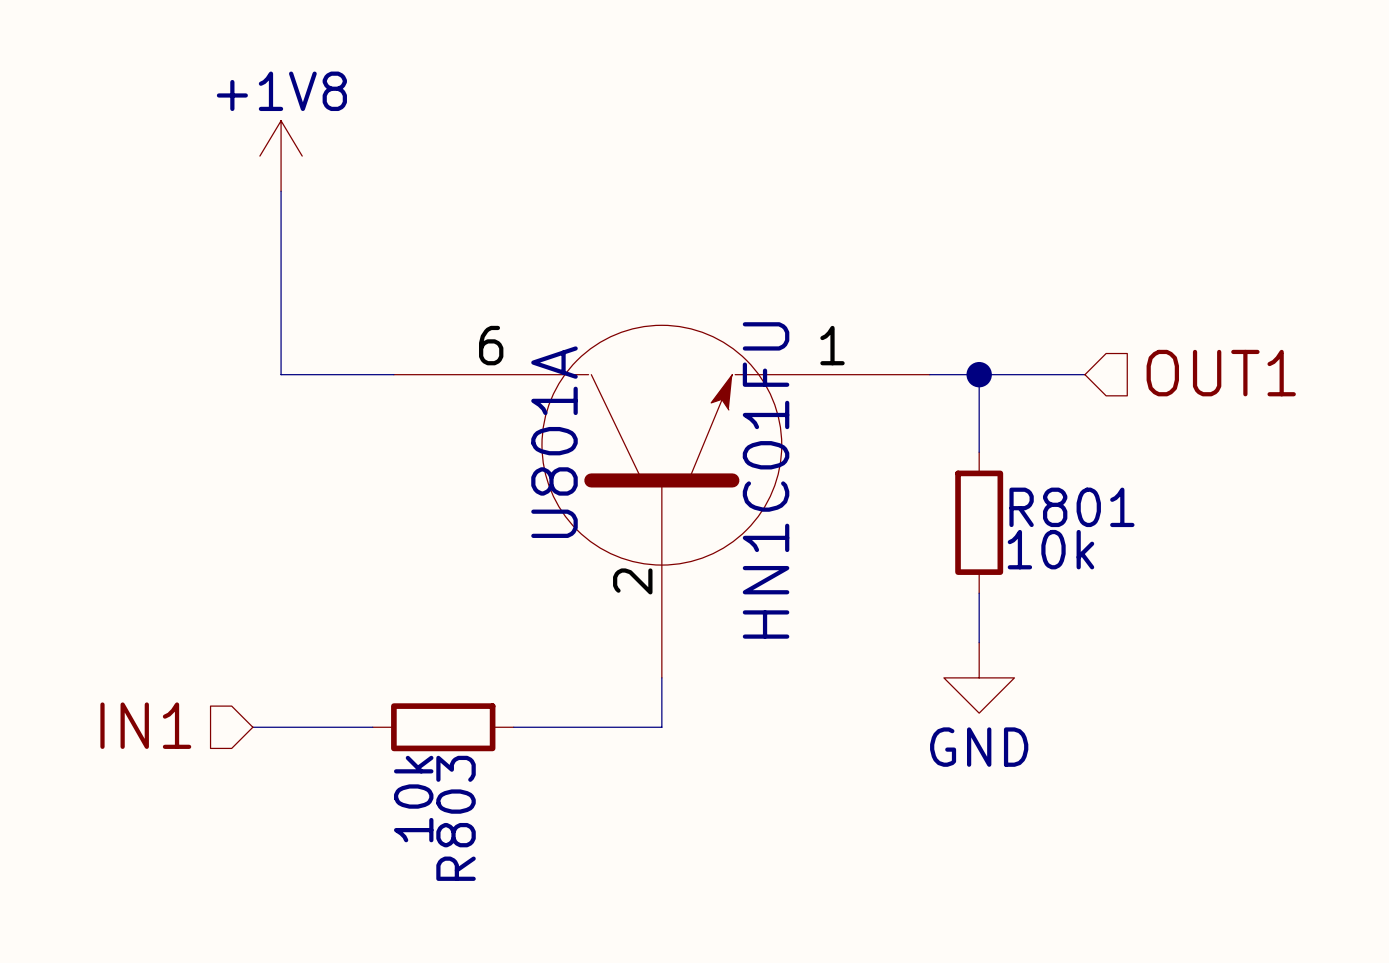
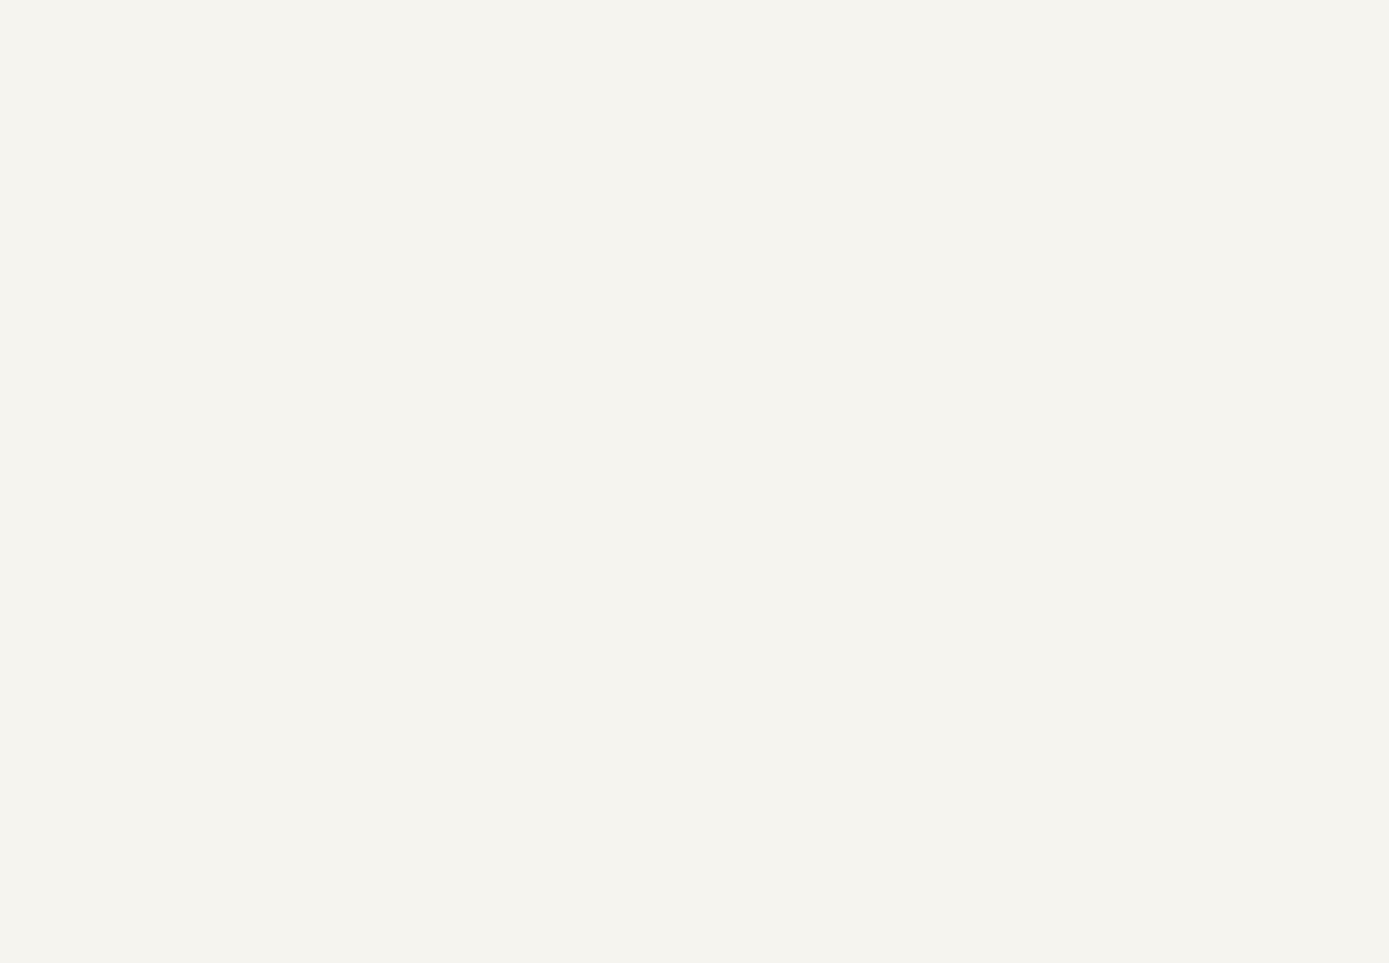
power symbol: +1V8 (281, 156) -> none
wire: (281, 191) (281, 374) (393, 374) -> none
hierarchical label: OUT1 (1221, 373) -> none
wire: (929, 374) (1084, 374) -> none
wire: (979, 374) (979, 452) -> none
junction: (979, 374) -> none
U801A: HN1C01FU (661, 501) -> none
R801: 10k (979, 522) -> none
wire: (979, 593) (979, 642) -> none
wire: (661, 677) (661, 727) (513, 727) -> none
power symbol: GND (979, 677) -> none
hierarchical label: IN1 (145, 725) -> none
wire: (252, 727) (372, 727) -> none
R803: 10k (443, 727) -> none

